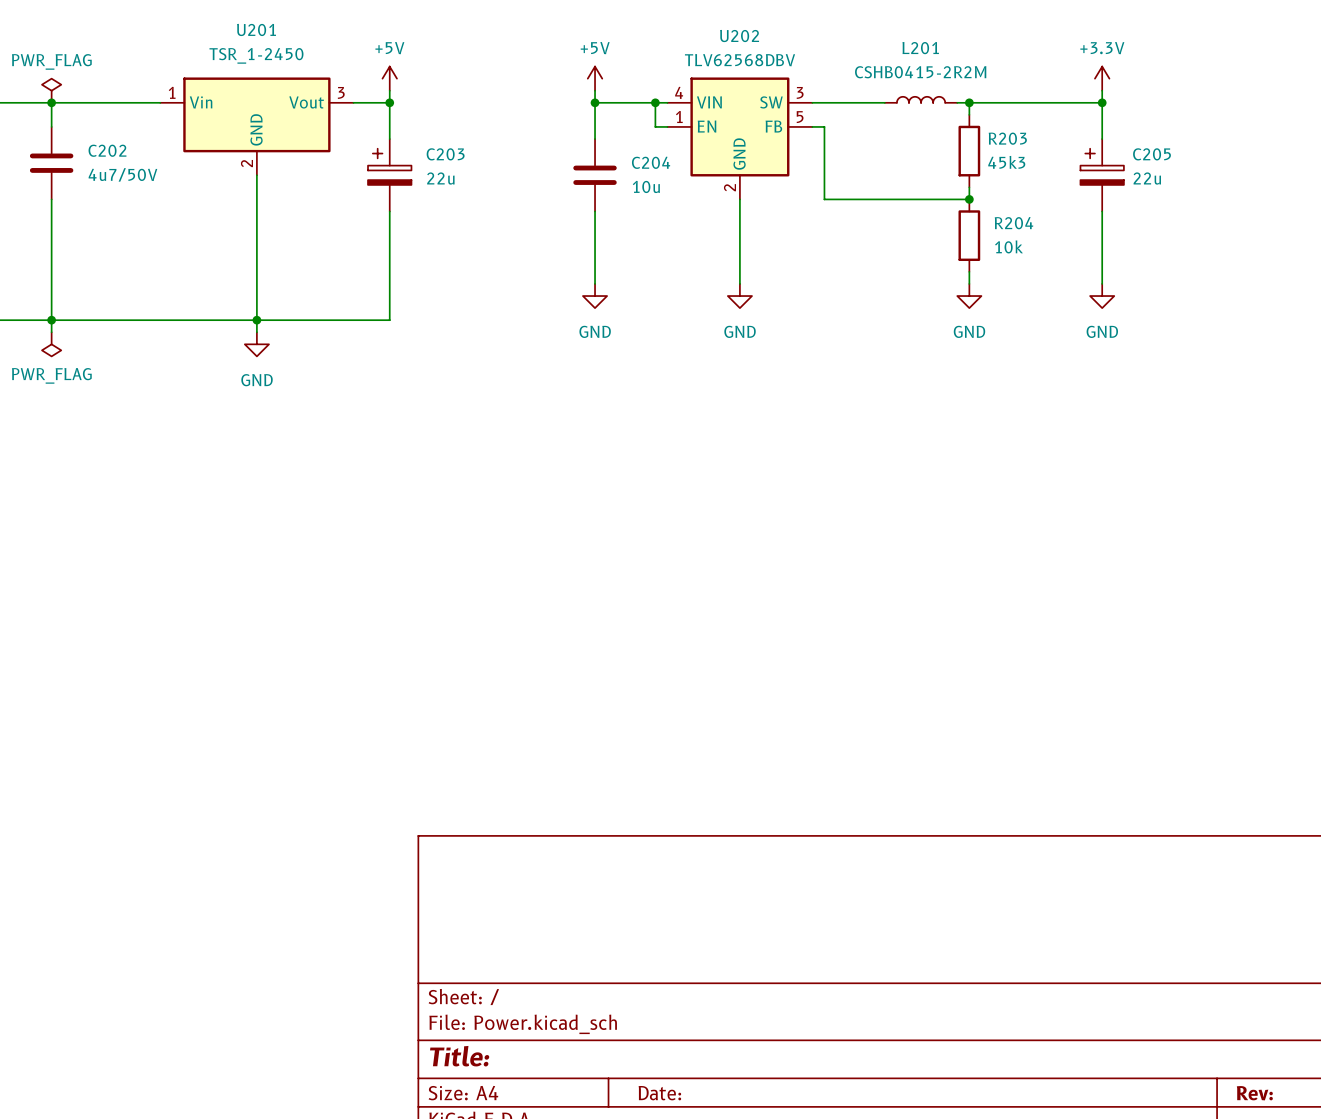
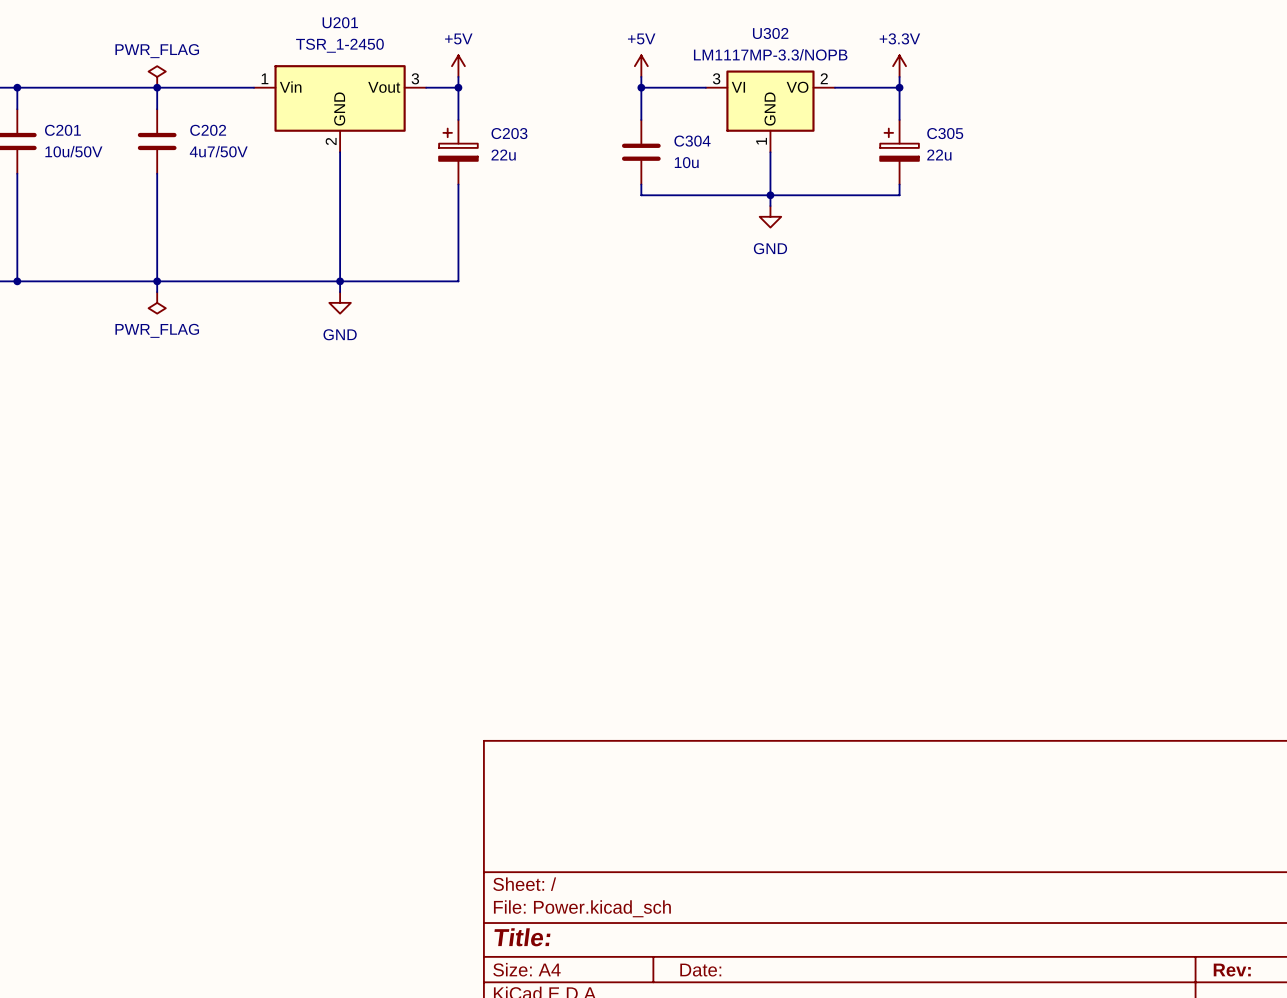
power symbol position: +3.3V (1102, 78) -> +3.3V (899, 66)
wire: (1102, 90) (1102, 139) -> none
L201: CSHB0415-2R2M (921, 99) -> none
wire: (655, 102) (655, 126) (667, 126) -> none
junction: (655, 102) -> none
junction: none -> (899, 87)
wire: (957, 102) (1102, 102) -> none
wire: (969, 102) (969, 114) -> none
junction: (969, 102) -> none
junction: (1102, 102) -> none
wire: (812, 126) (824, 126) (824, 199) (969, 199) (969, 187) -> none
U302: none -> LM1117MP-3.3/NOPB (770, 111)
U202: TLV62568DBV (739, 138) -> none
R203: 45k3 (969, 151) -> none
C204 name: C204 (651, 162) -> C304 (692, 141)
C305: none -> 22u (899, 152)
C205: 22u (1102, 175) -> none
junction: (969, 199) -> none
wire: (1102, 211) (1102, 283) -> none
wire: (595, 223) (595, 283) -> (641, 195) (899, 195) (899, 184)
junction: none -> (770, 195)
wire: (739, 235) (739, 283) -> (899, 76) (899, 119)
R204: 10k (969, 235) -> none
wire: (969, 271) (969, 283) -> none
power symbol: GND (595, 296) -> none
power symbol position: GND (739, 296) -> GND (770, 216)
power symbol: GND (969, 296) -> none
power symbol: GND (1102, 296) -> none

